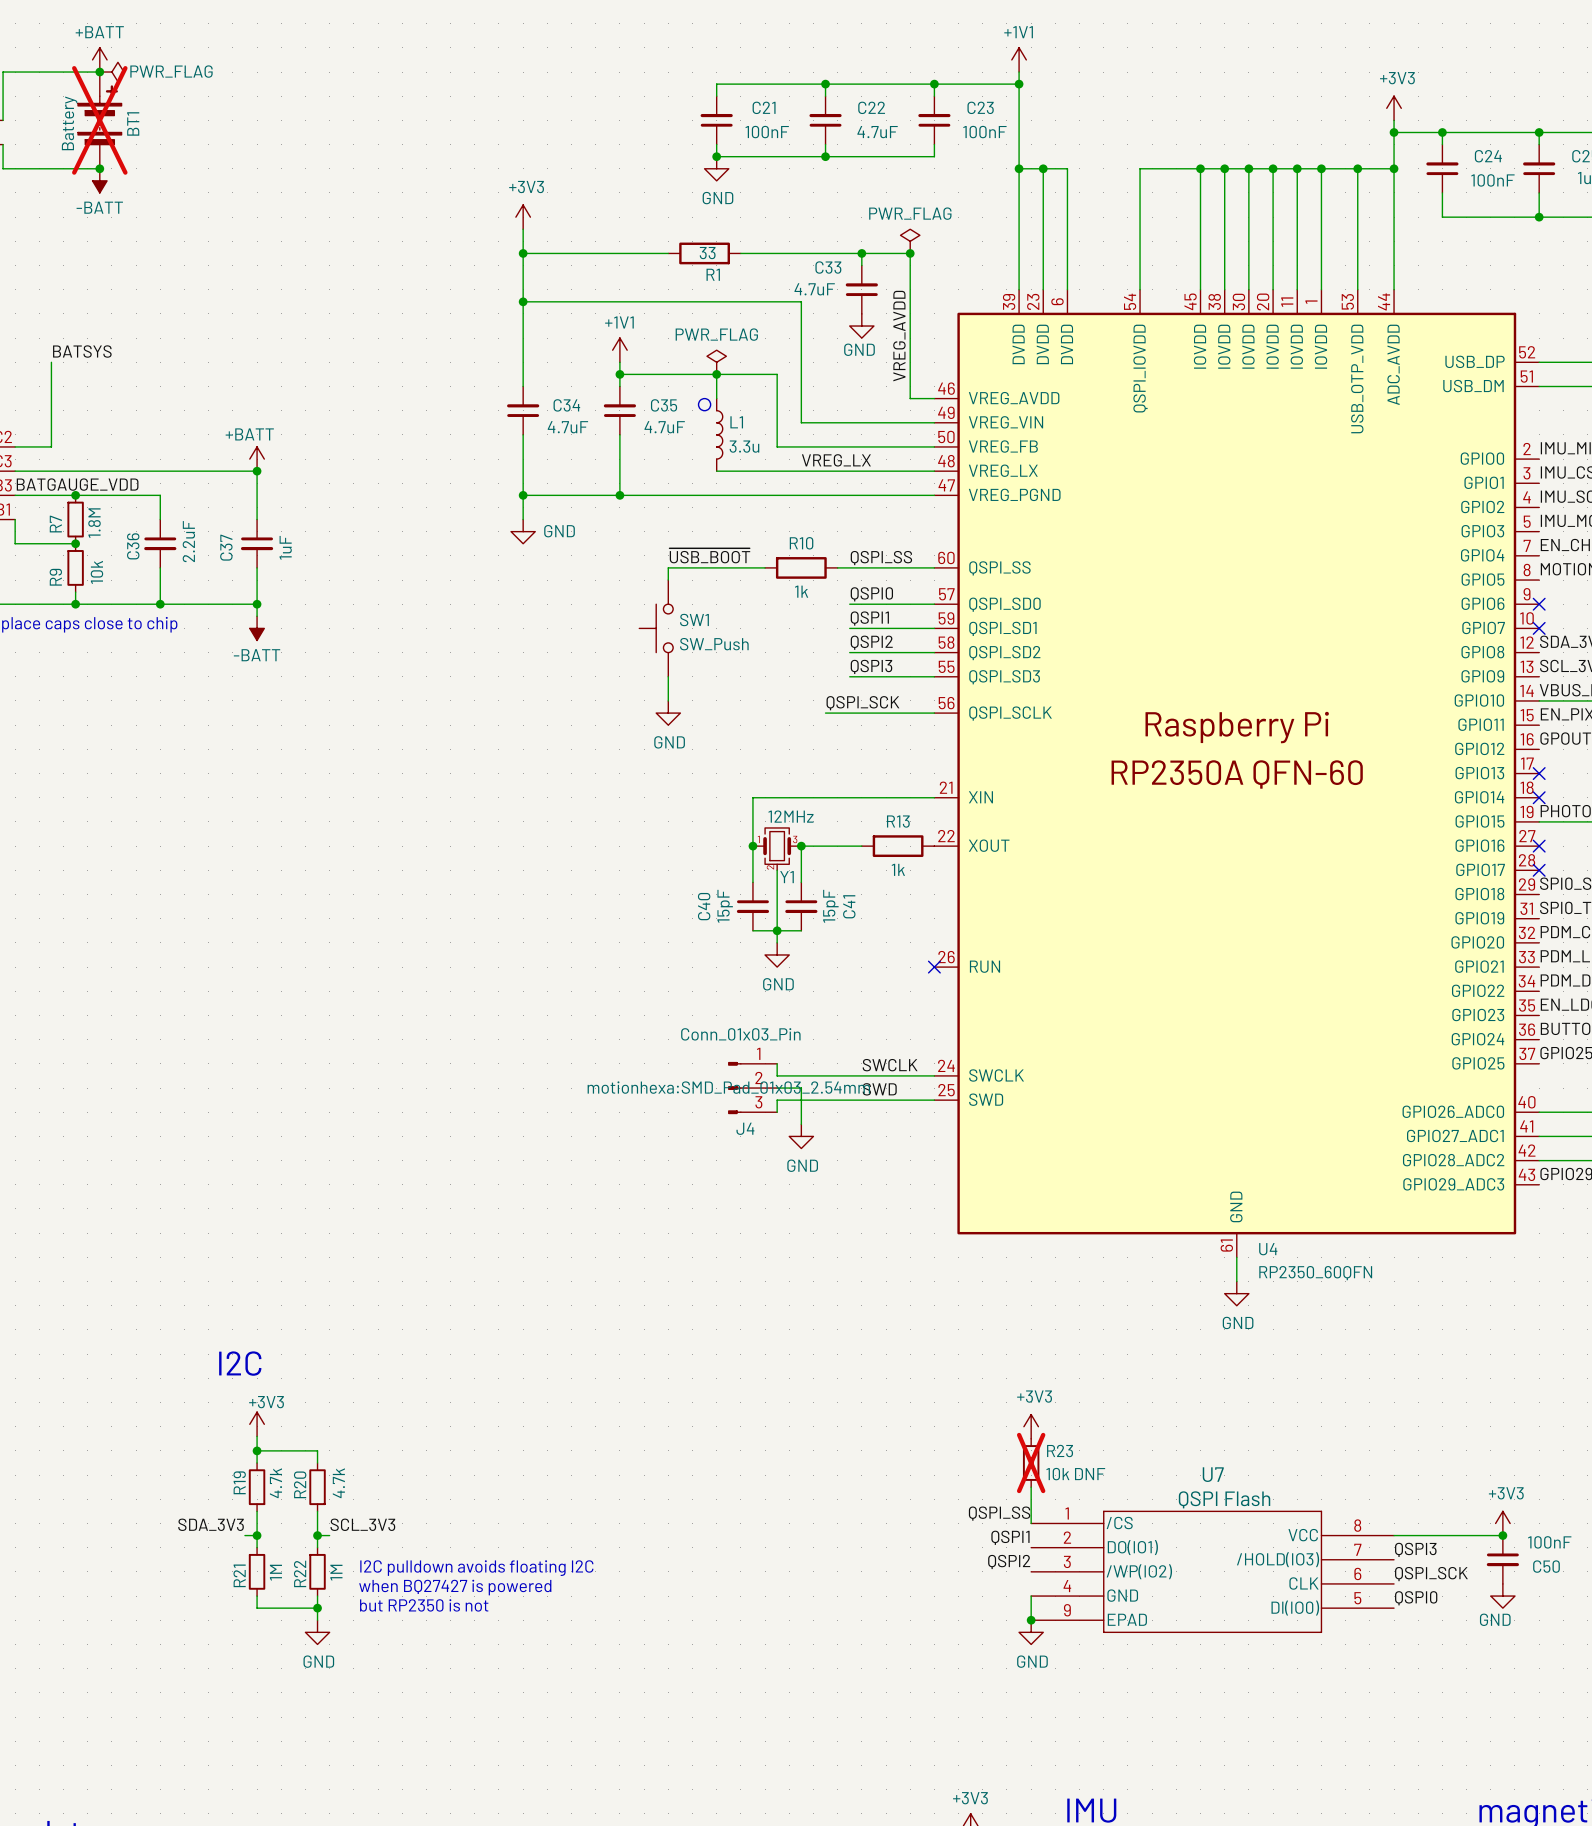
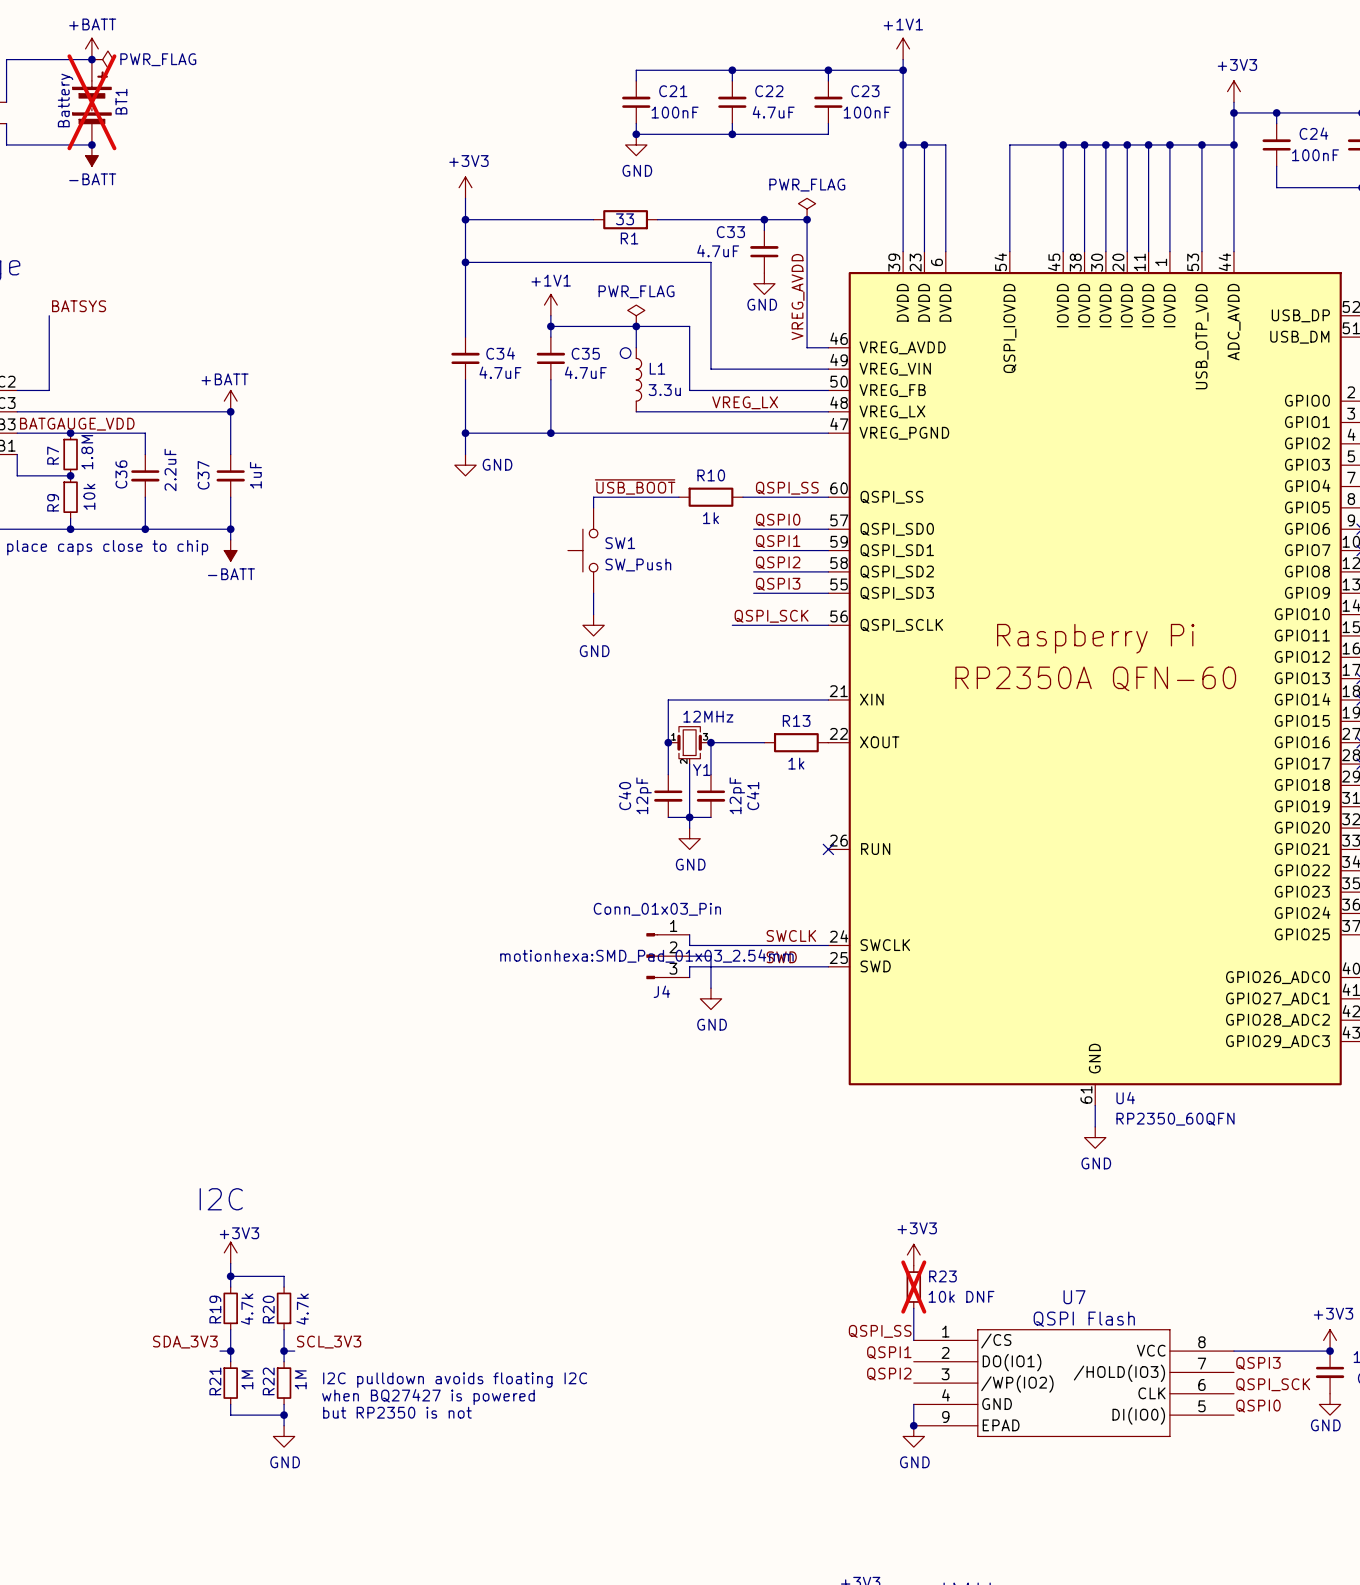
C40 value: 15pF (725, 906) -> 12pF (644, 795)
C41 value: 15pF (830, 906) -> 12pF (737, 795)

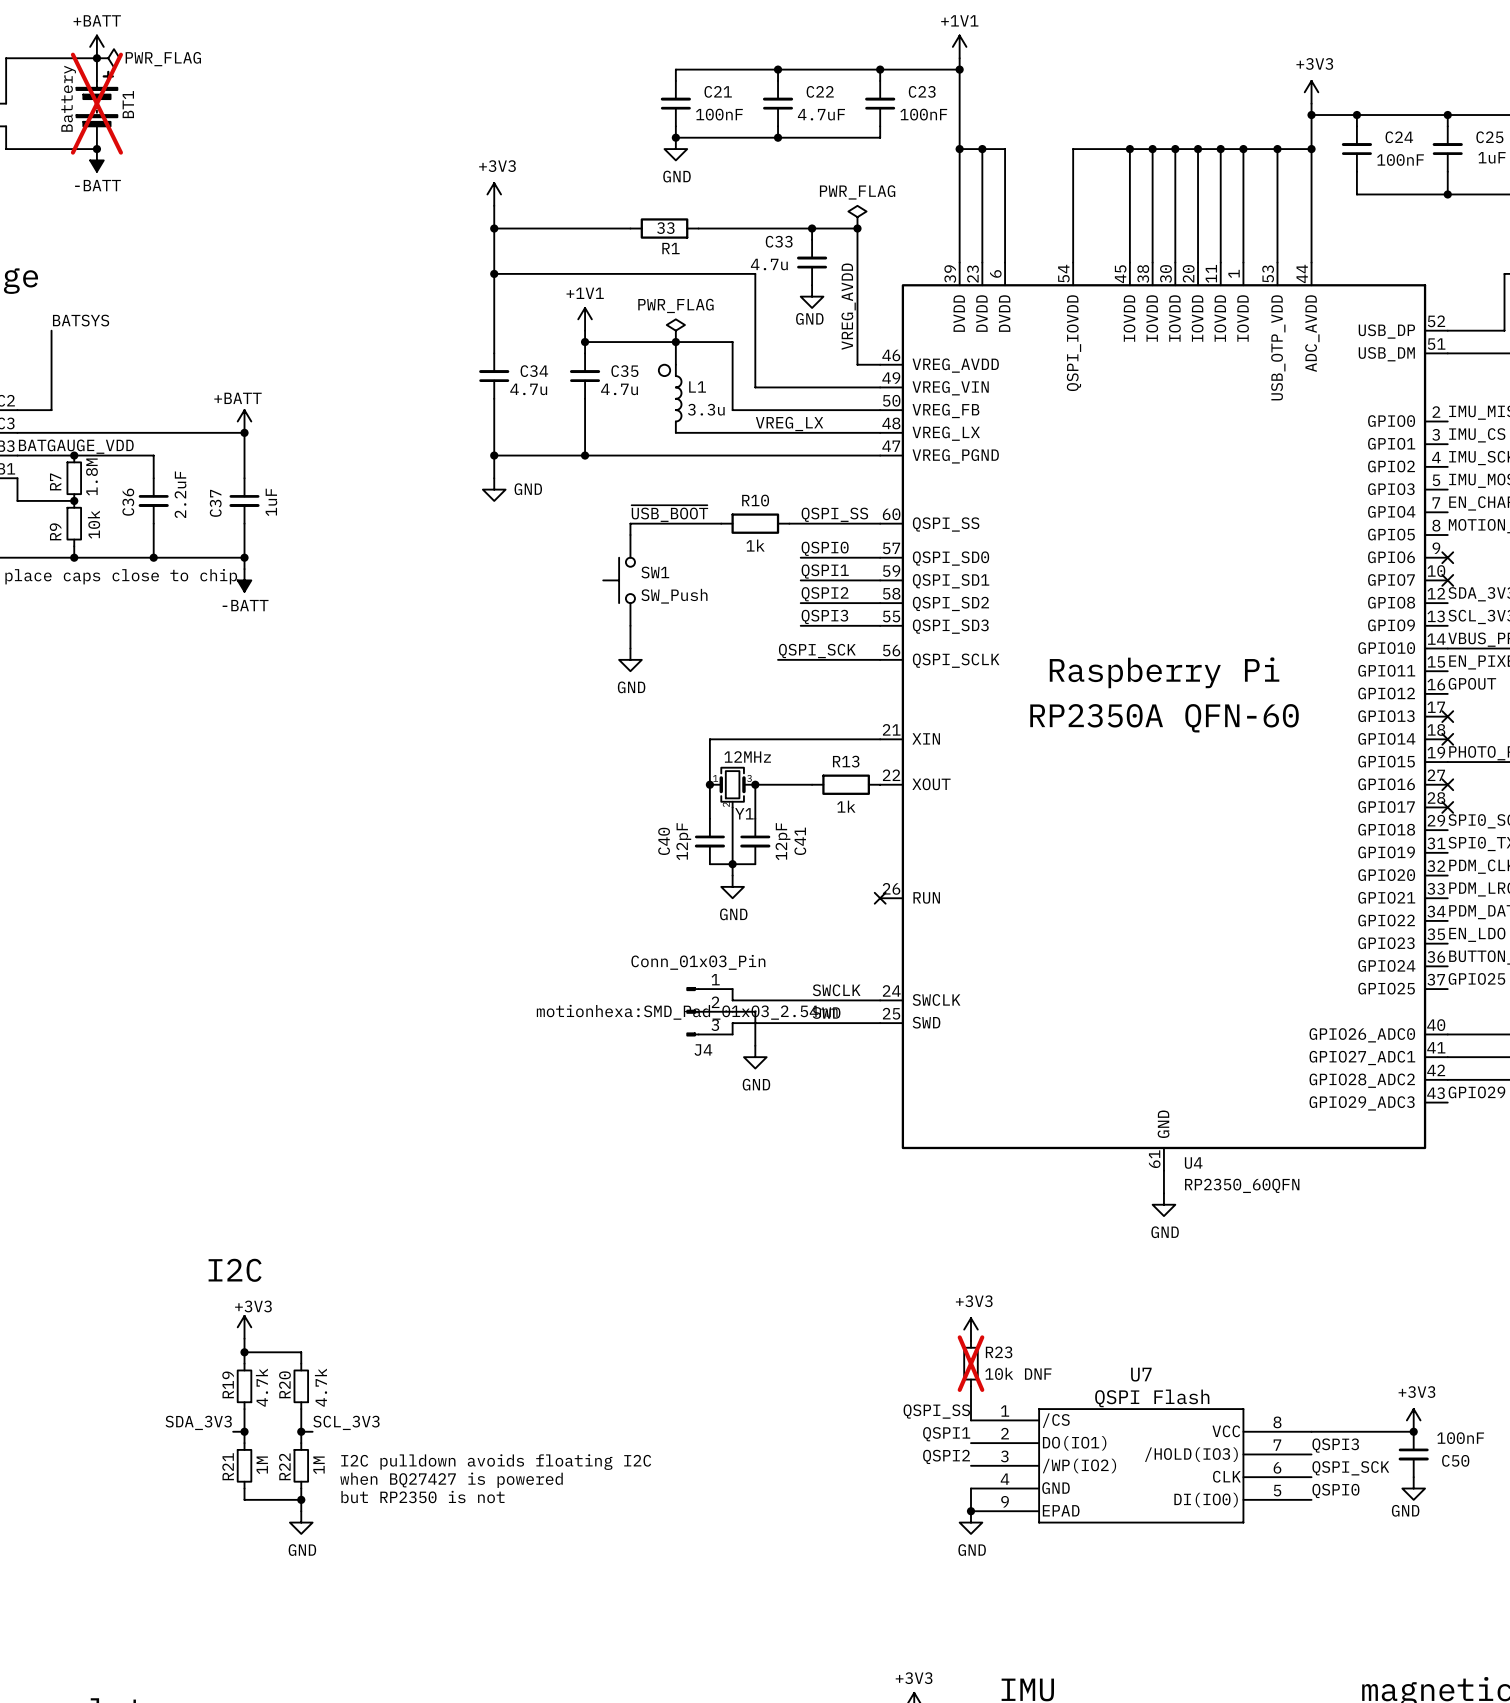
C33 value: 4.7uF (718, 251) -> 4.7u (769, 264)
C34 value: 4.7uF (500, 372) -> 4.7u (528, 389)
C35 value: 4.7uF (585, 372) -> 4.7u (619, 389)

